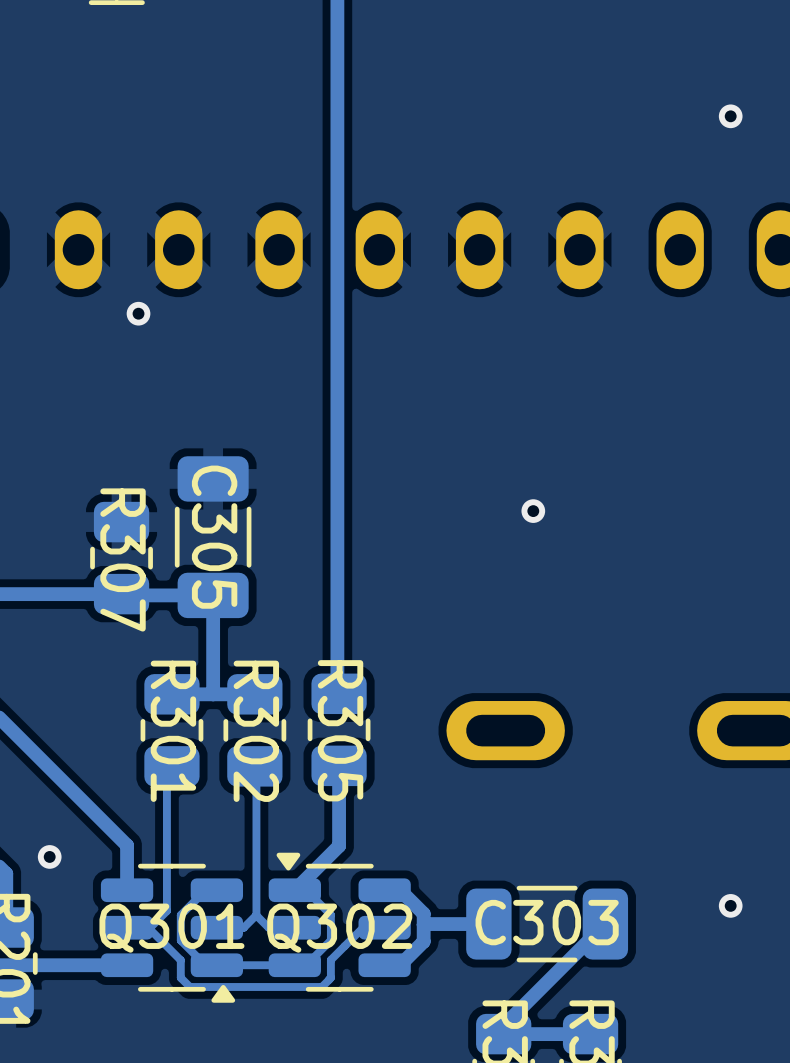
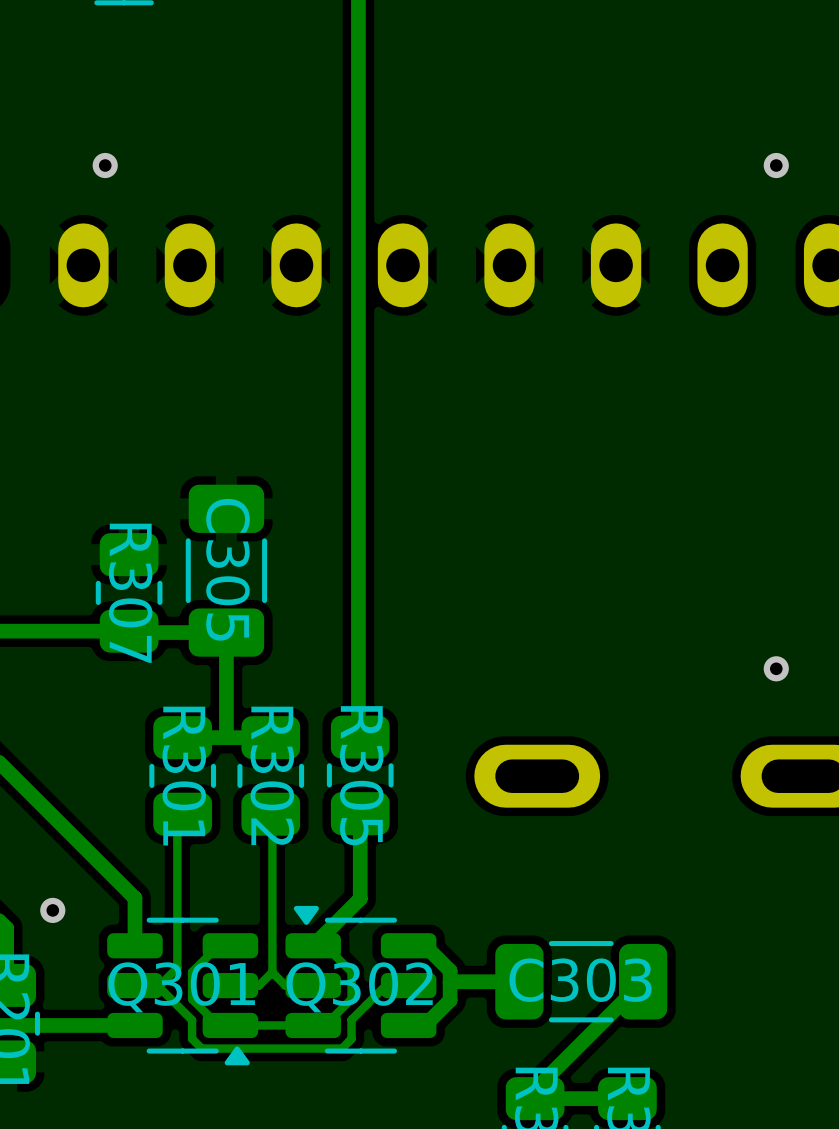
via position: (730, 116) -> (776, 165)
via position: (138, 313) -> (105, 165)
via: (533, 511) -> none
via: none -> (776, 668)
via: (730, 905) -> none

